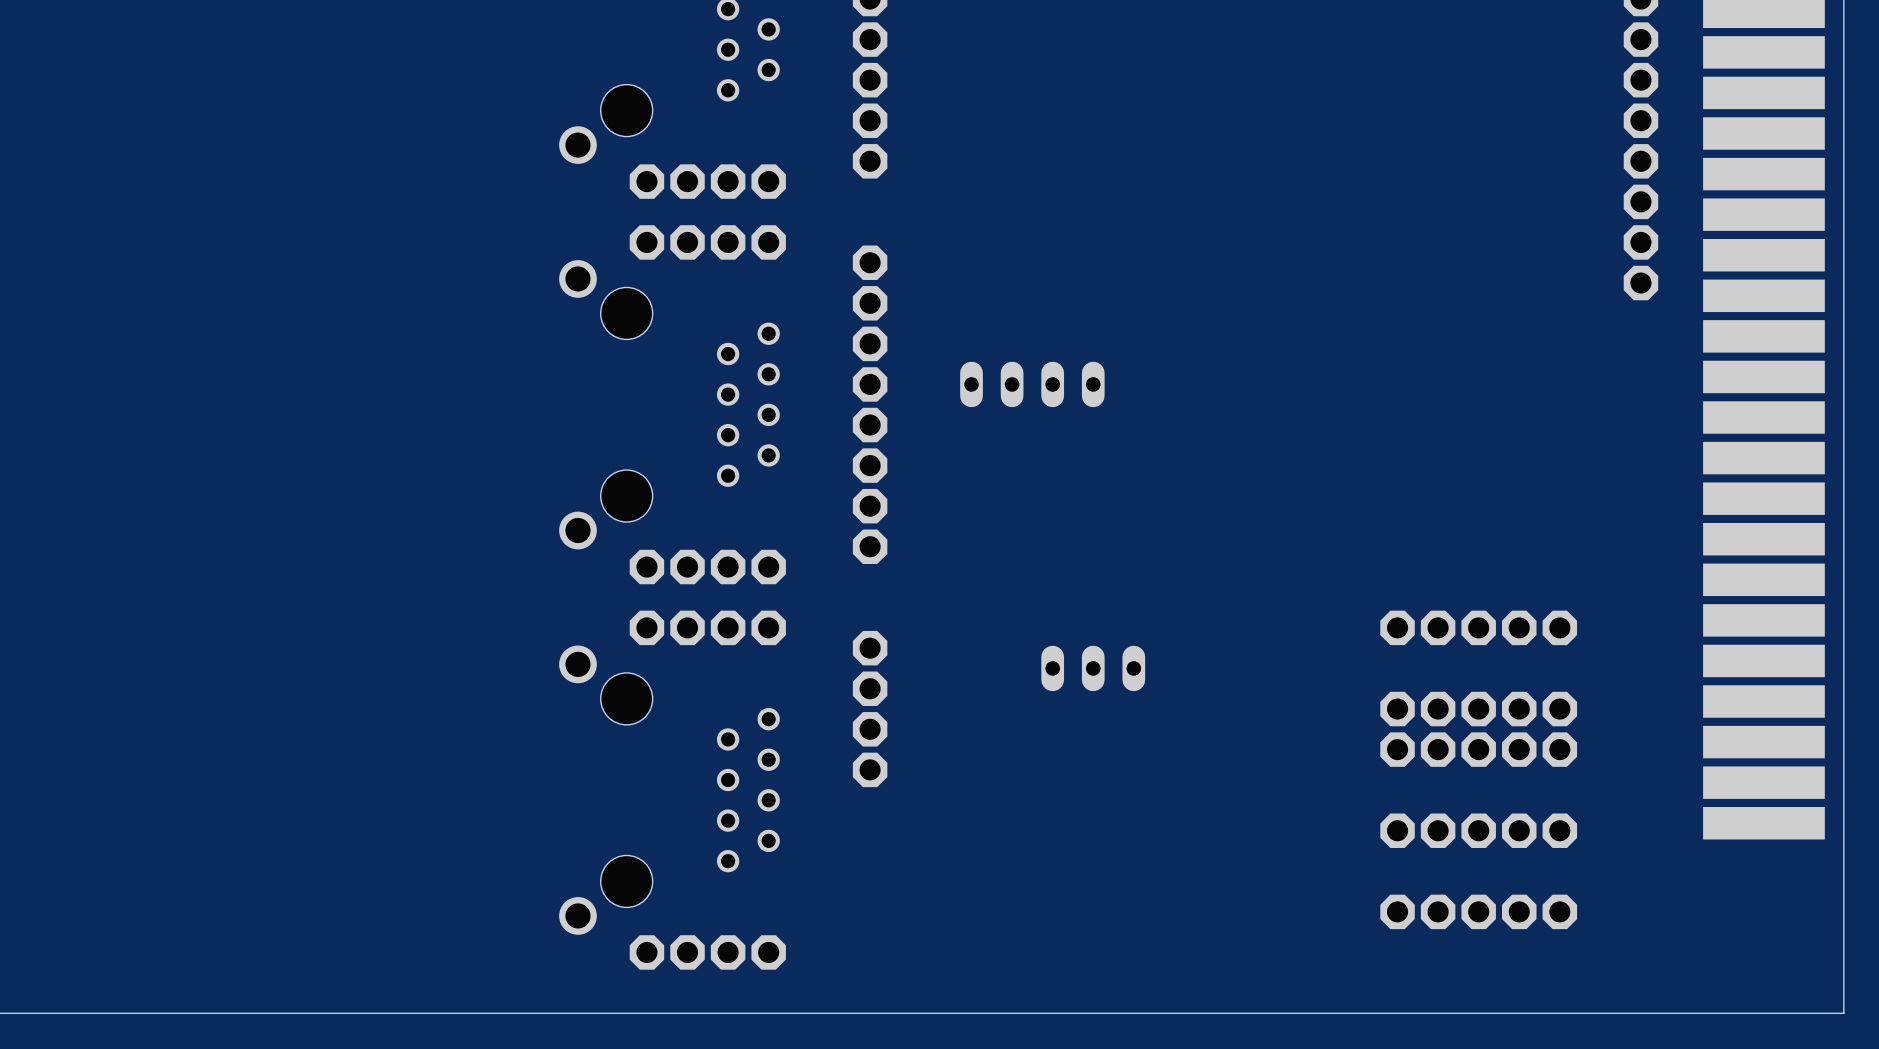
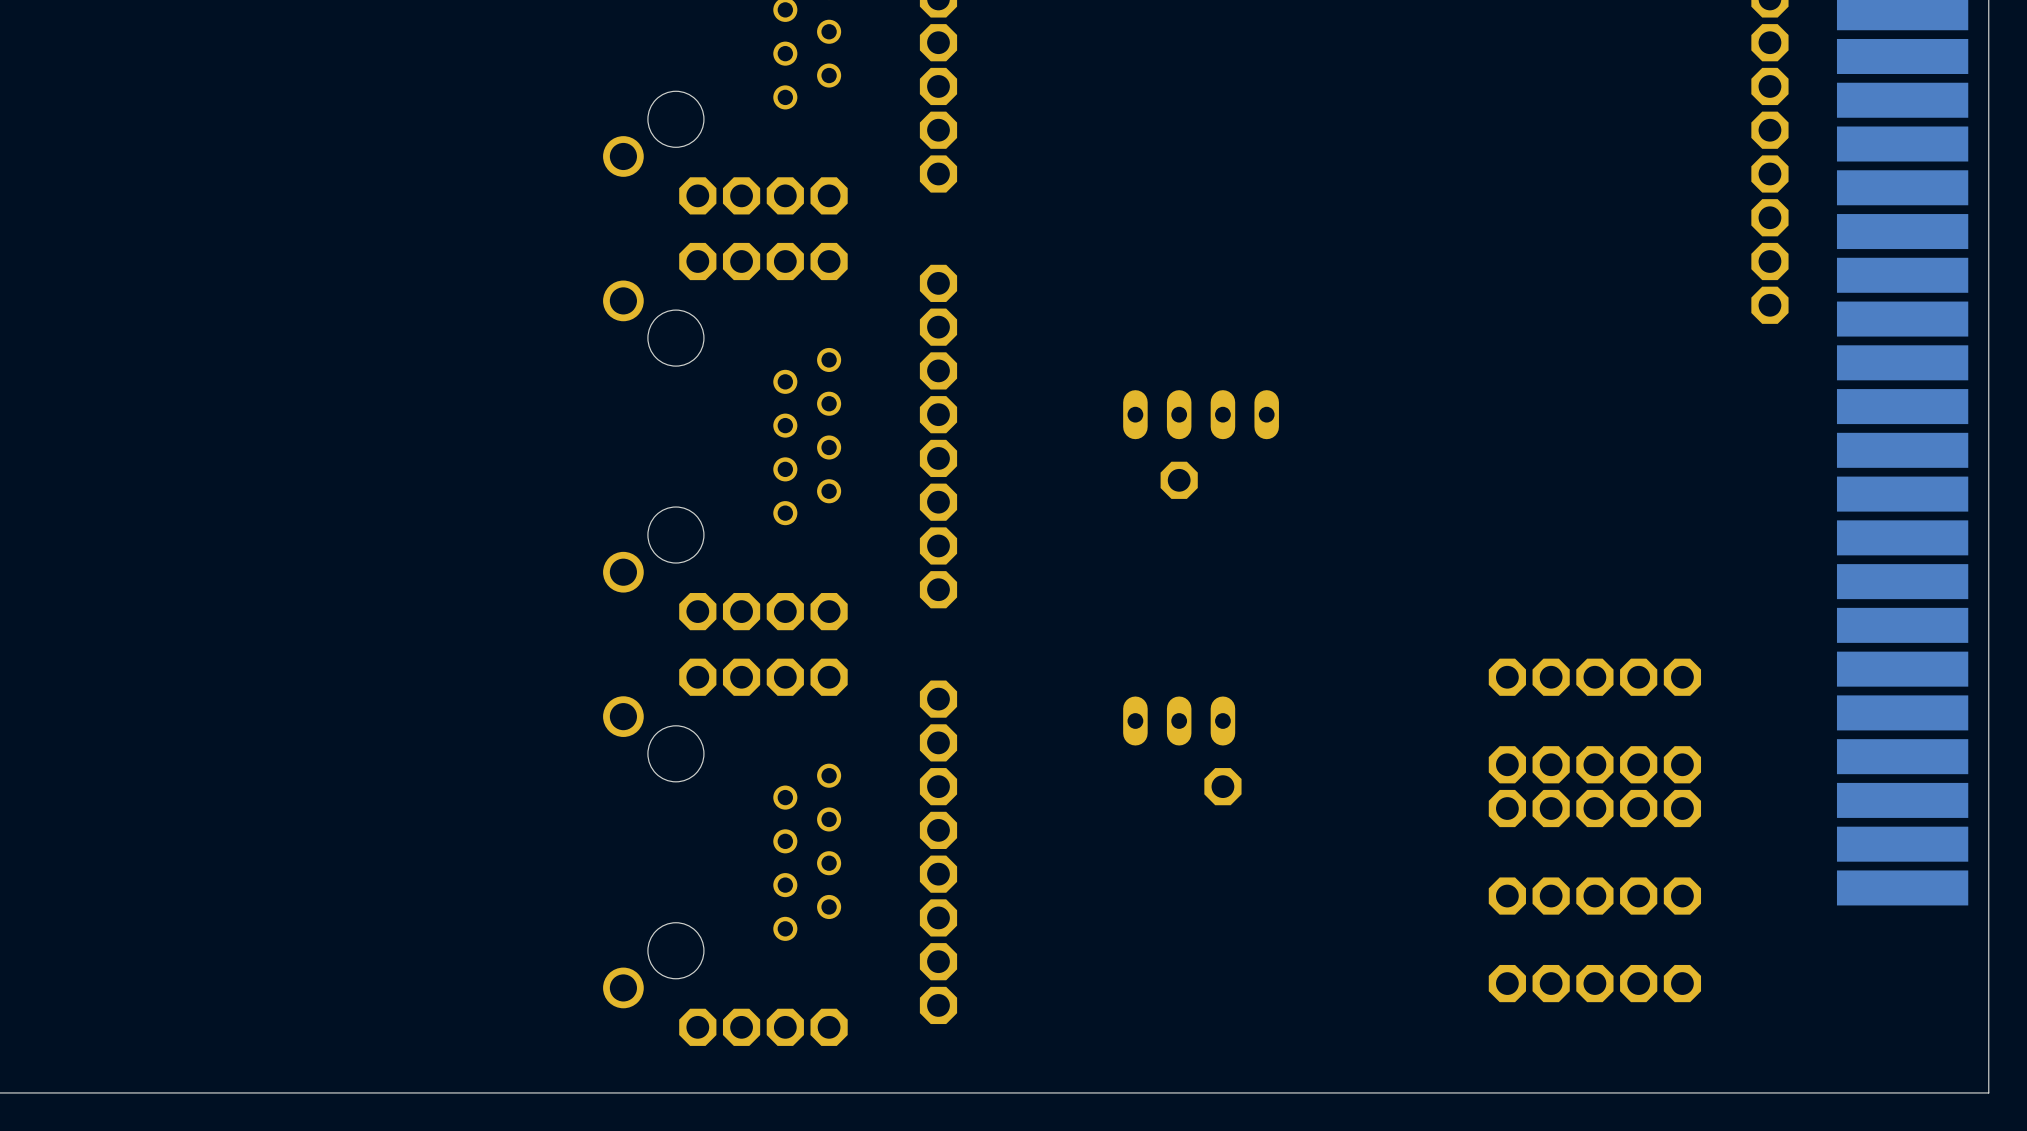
part position: (1032, 384) -> (1201, 414)
part: none -> (1179, 480)
part: none -> (1222, 786)
part: none -> (938, 874)
part: none -> (938, 917)
part: none -> (938, 961)
part: none -> (938, 1005)

